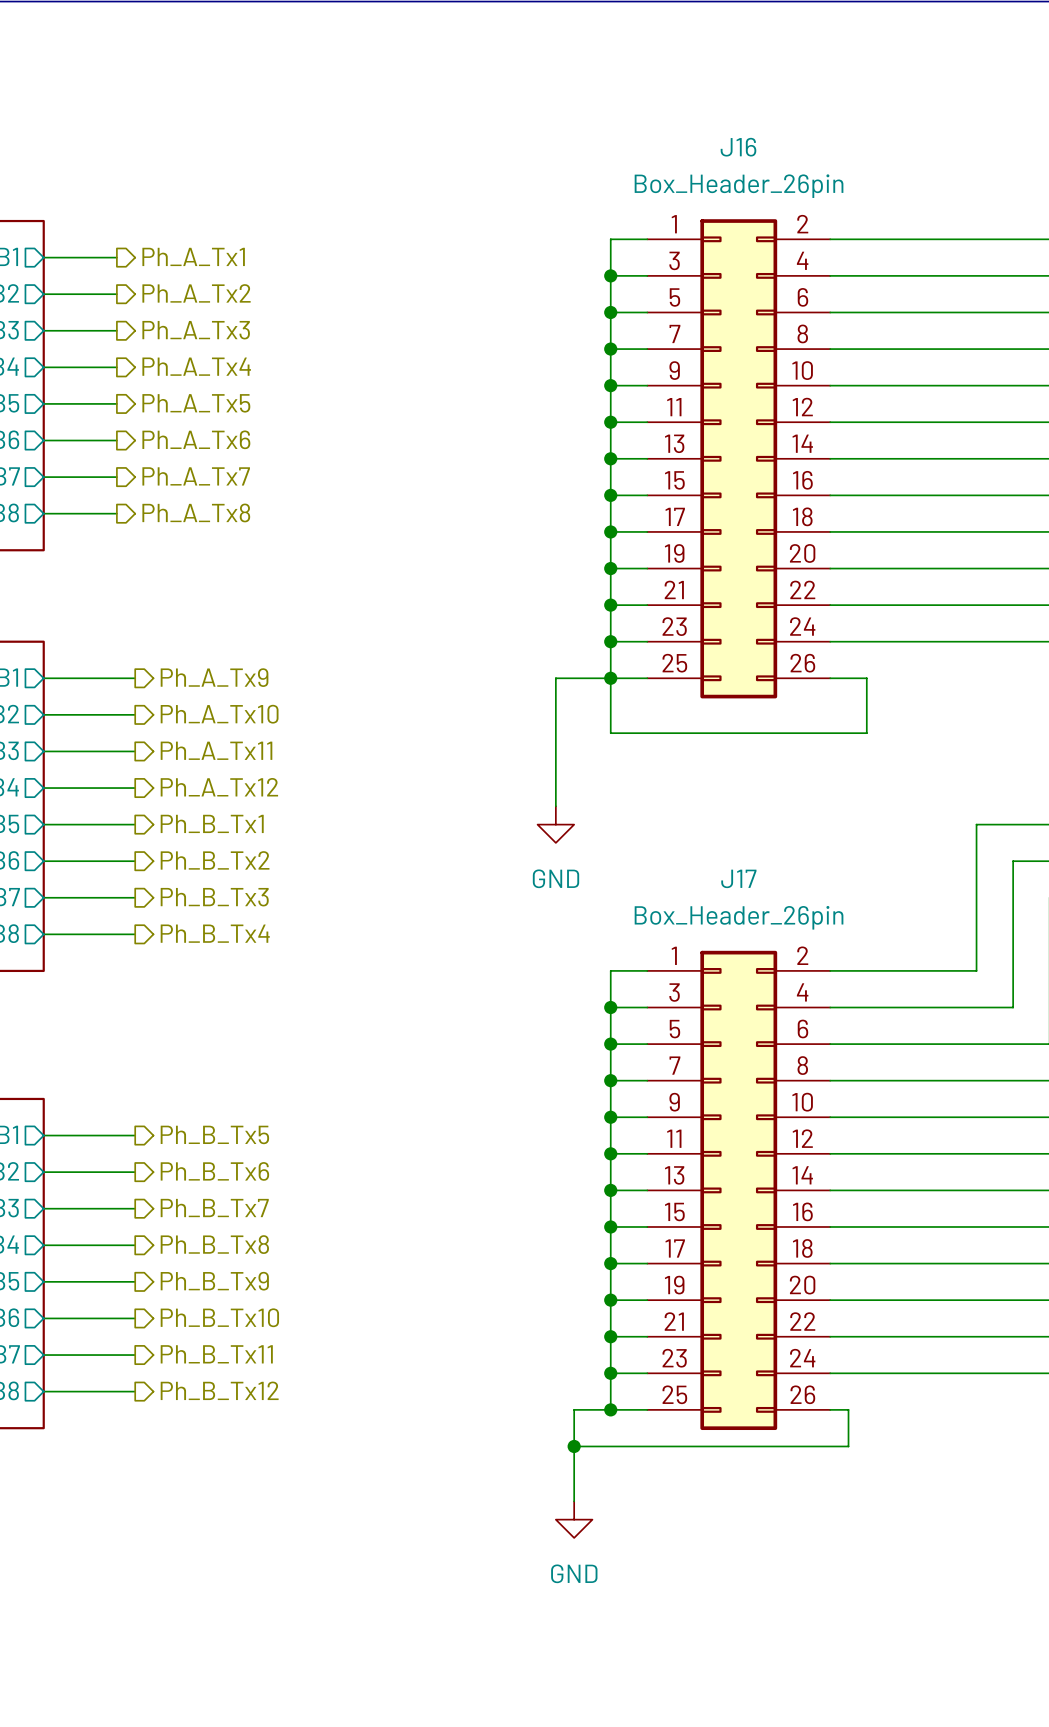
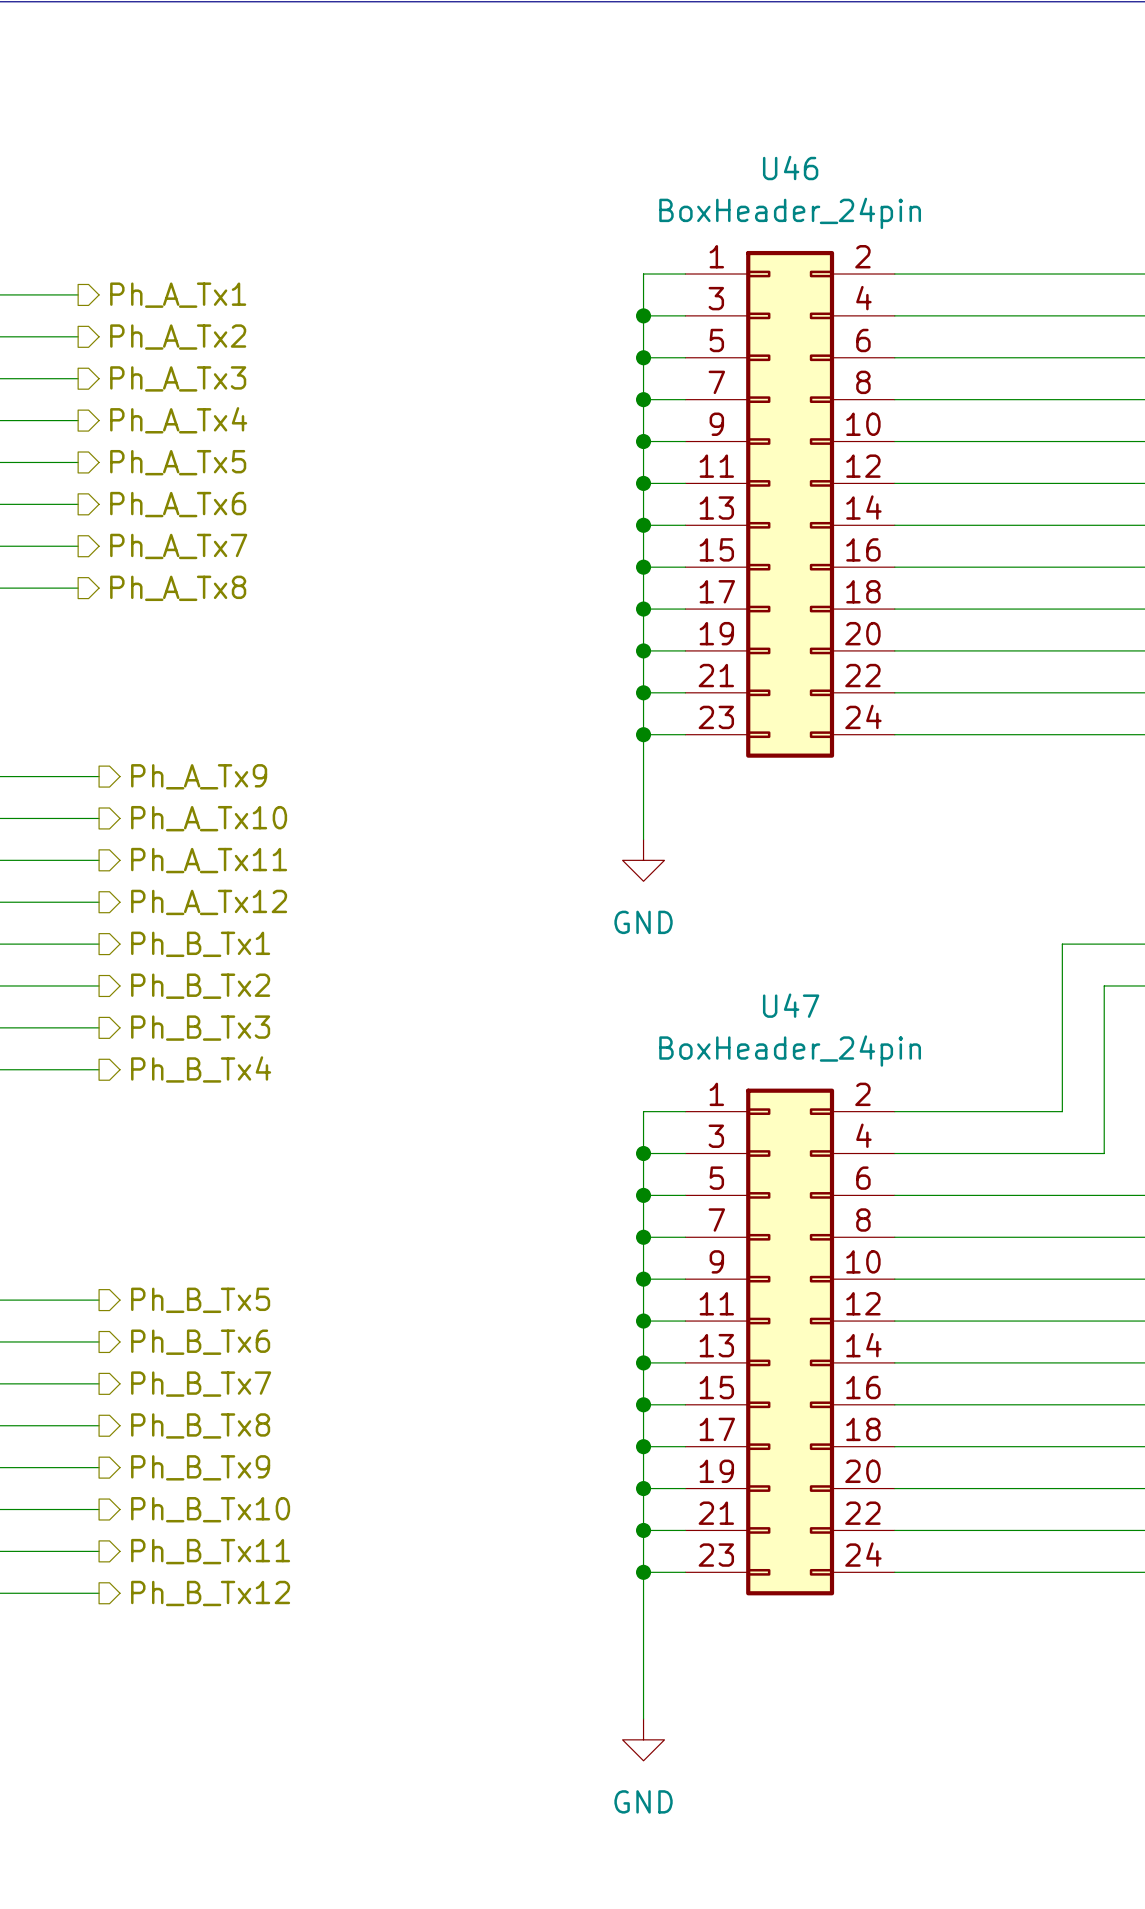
U46: none -> BoxHeader_24pin (790, 504)
J16: Box_Header_26pin (738, 458) -> none
junction: (610, 678) -> none
wire: (647, 678) (555, 678) (555, 806) -> none
wire: (830, 678) (866, 678) (866, 733) (610, 733) -> none
power symbol position: GND (555, 824) -> GND (643, 860)
U47: none -> BoxHeader_24pin (790, 1341)
J17: Box_Header_26pin (738, 1190) -> none
wire: none -> (643, 1614) (643, 1718)
junction: (610, 1409) -> none
wire: (647, 1409) (574, 1409) (574, 1501) -> none
wire: (830, 1409) (848, 1409) (848, 1446) (574, 1446) -> none
junction: (574, 1446) -> none
power symbol position: GND (574, 1519) -> GND (643, 1739)

